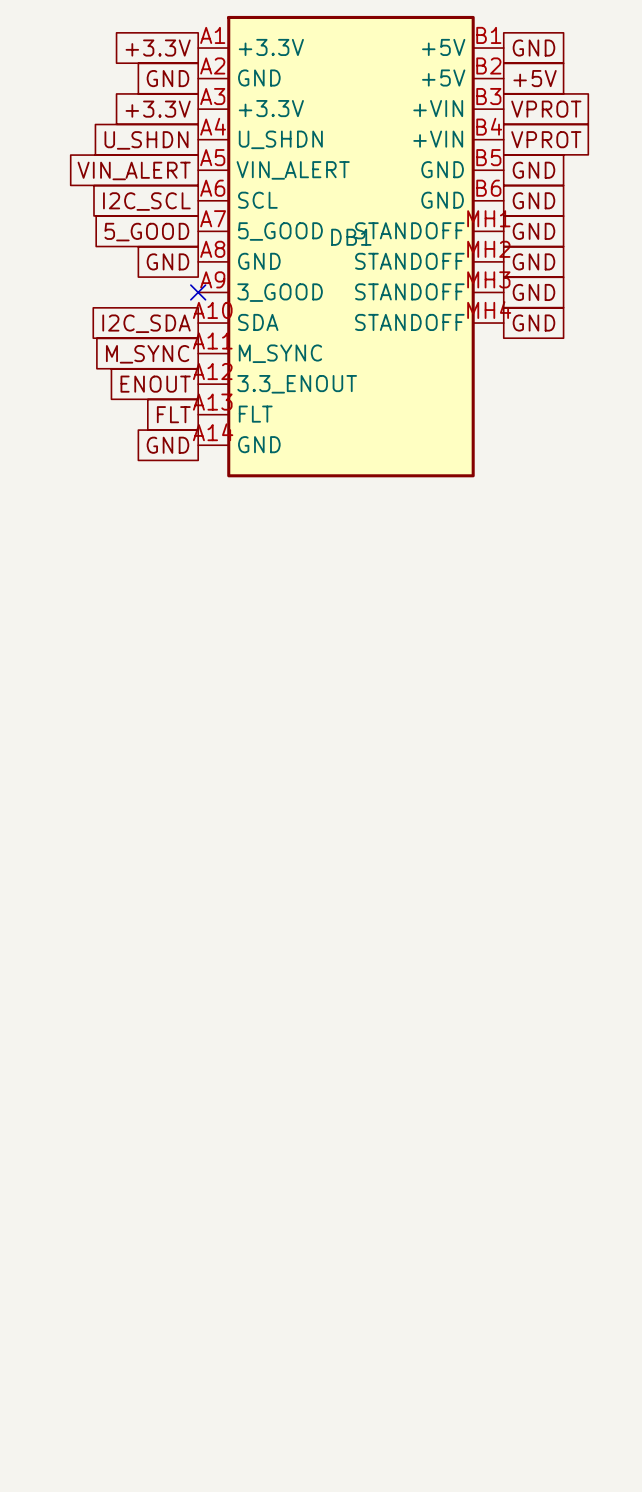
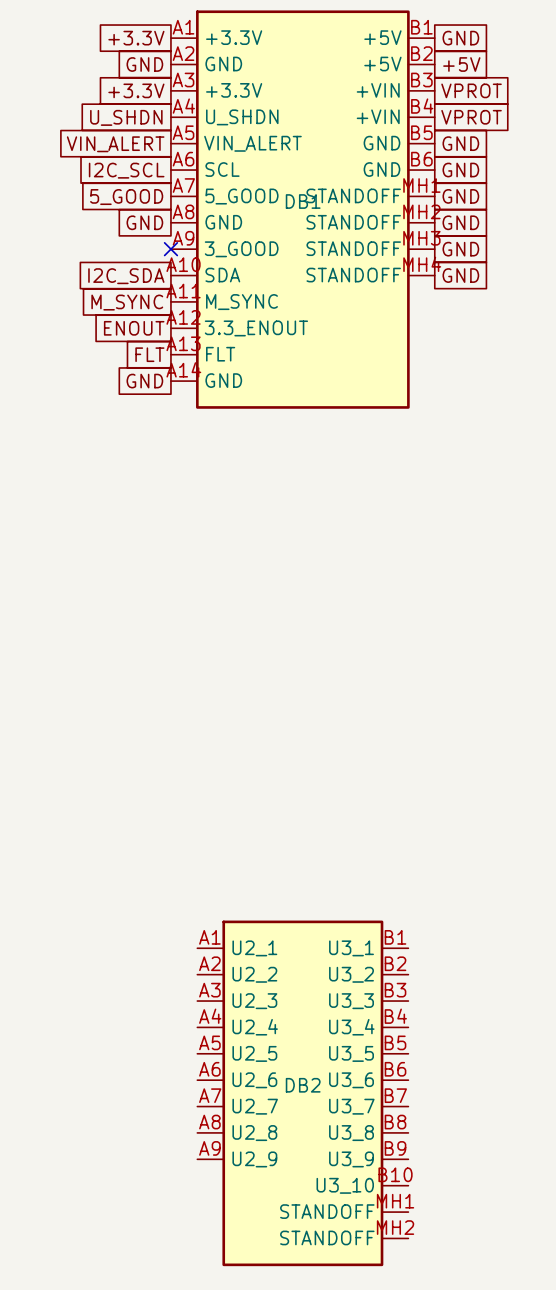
DB2: none -> (302, 1093)

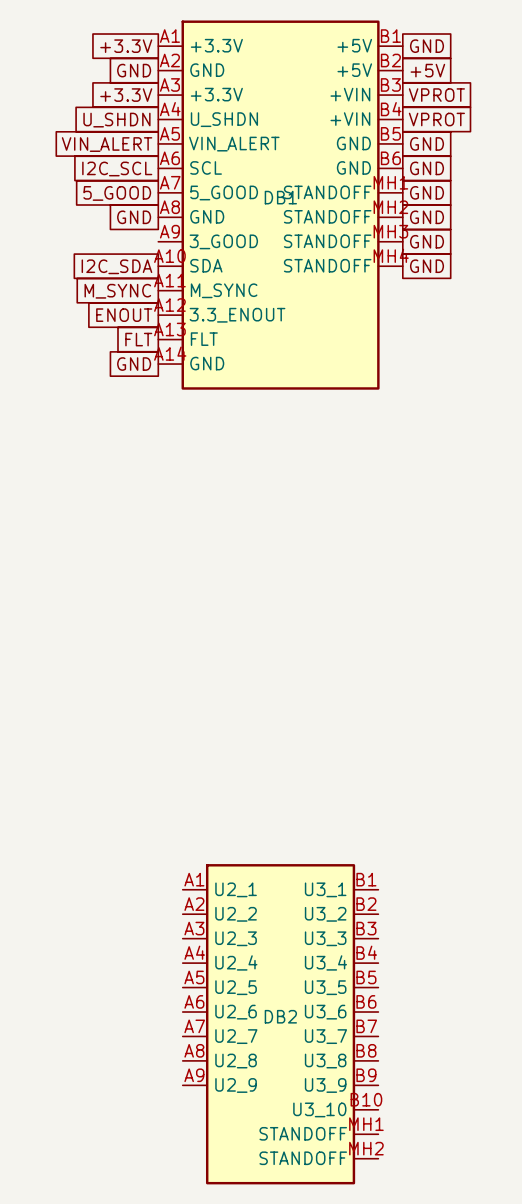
no-connect mark: (170, 249) -> none

